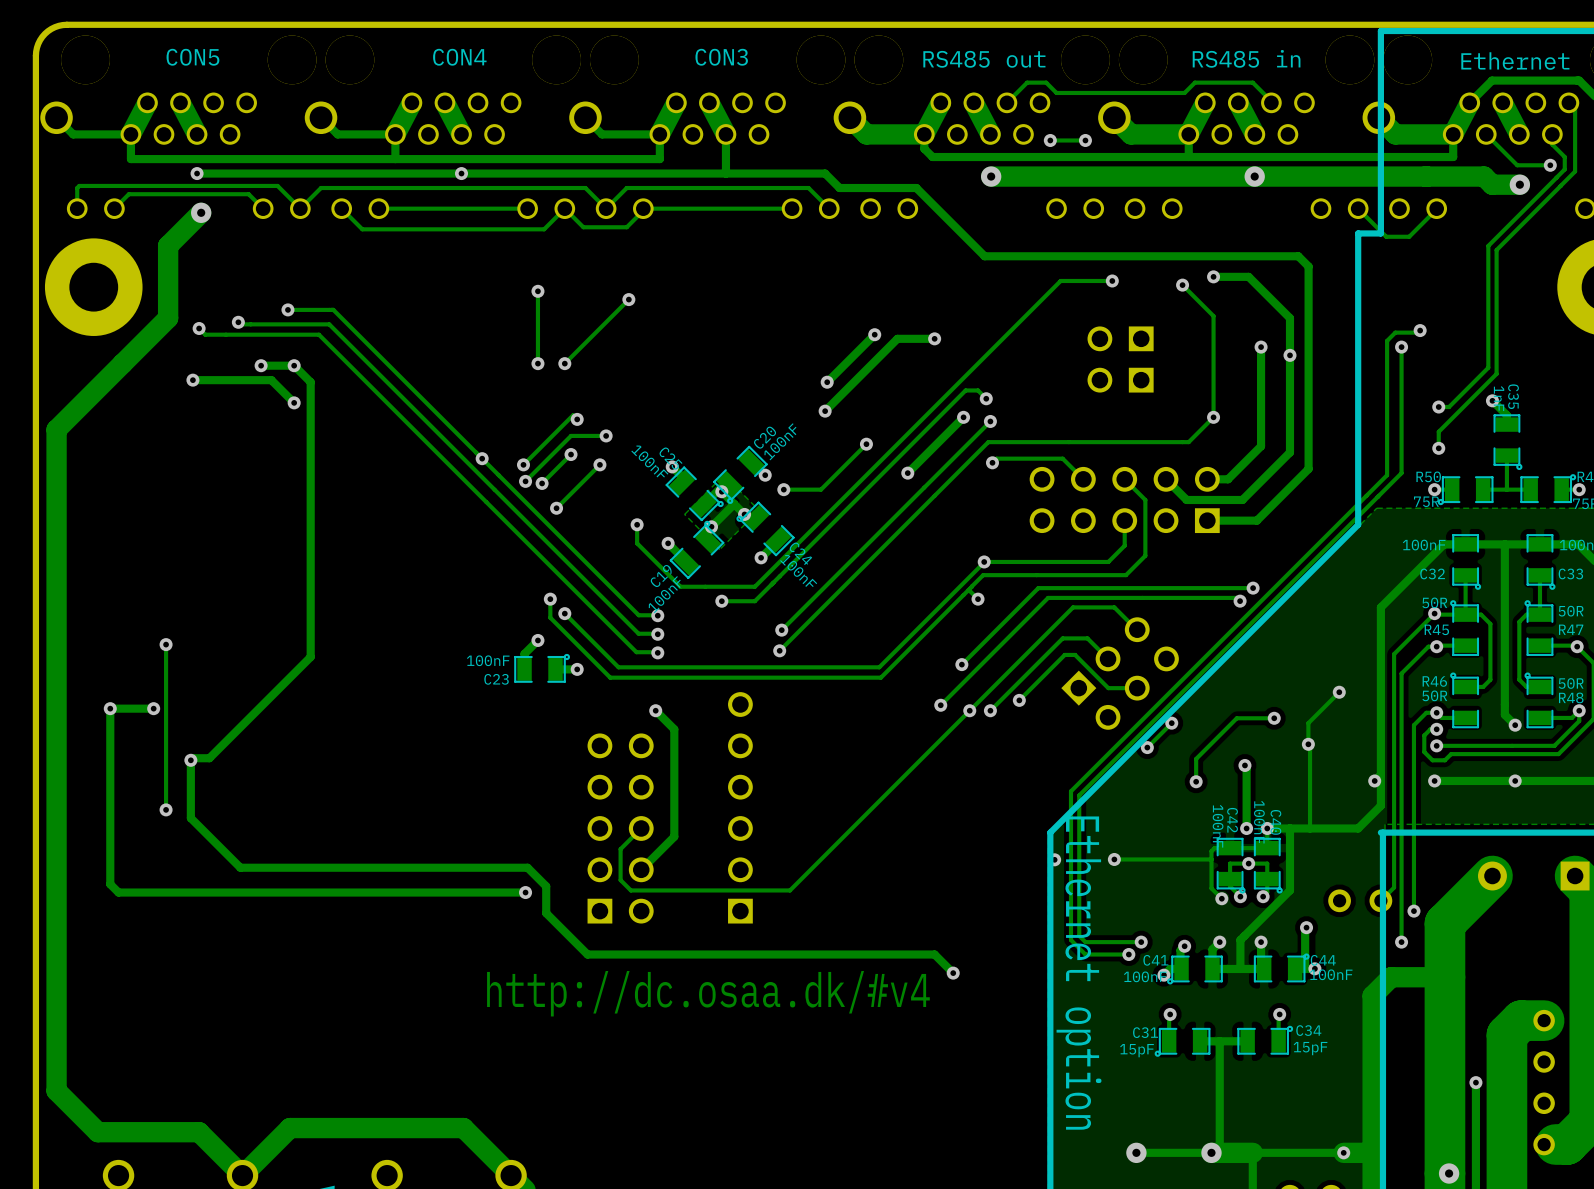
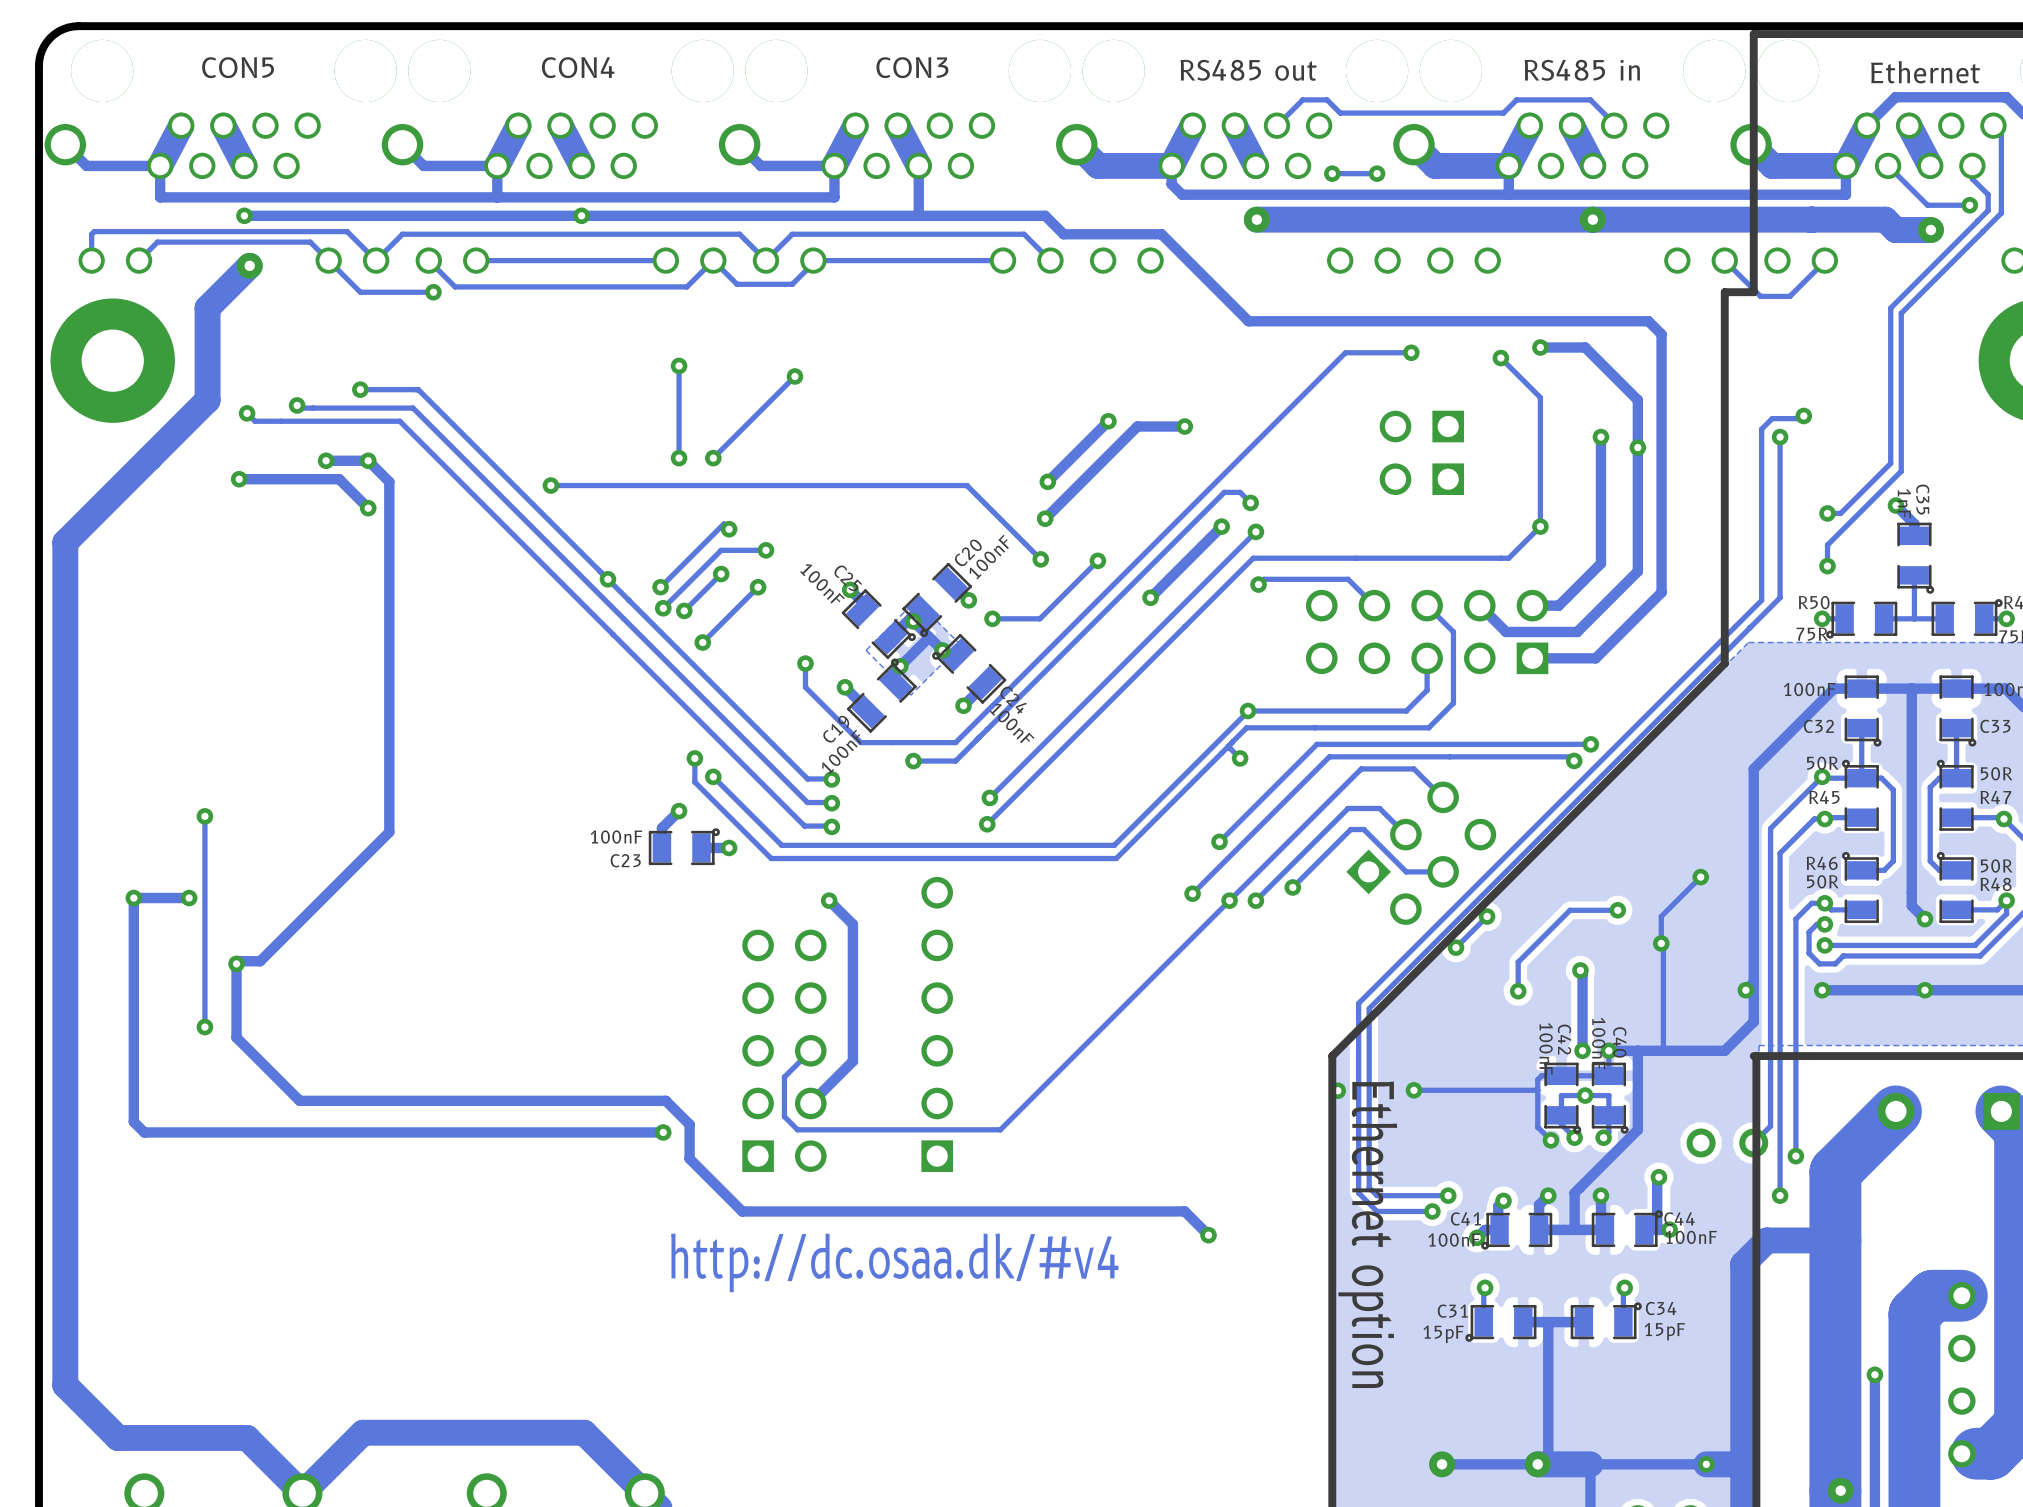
track: none -> (328, 260) (360, 292) (433, 292)
via: none -> (433, 292)
track: none -> (550, 485) (966, 485) (1040, 559)
via: none -> (550, 485)
via: none -> (1040, 559)

